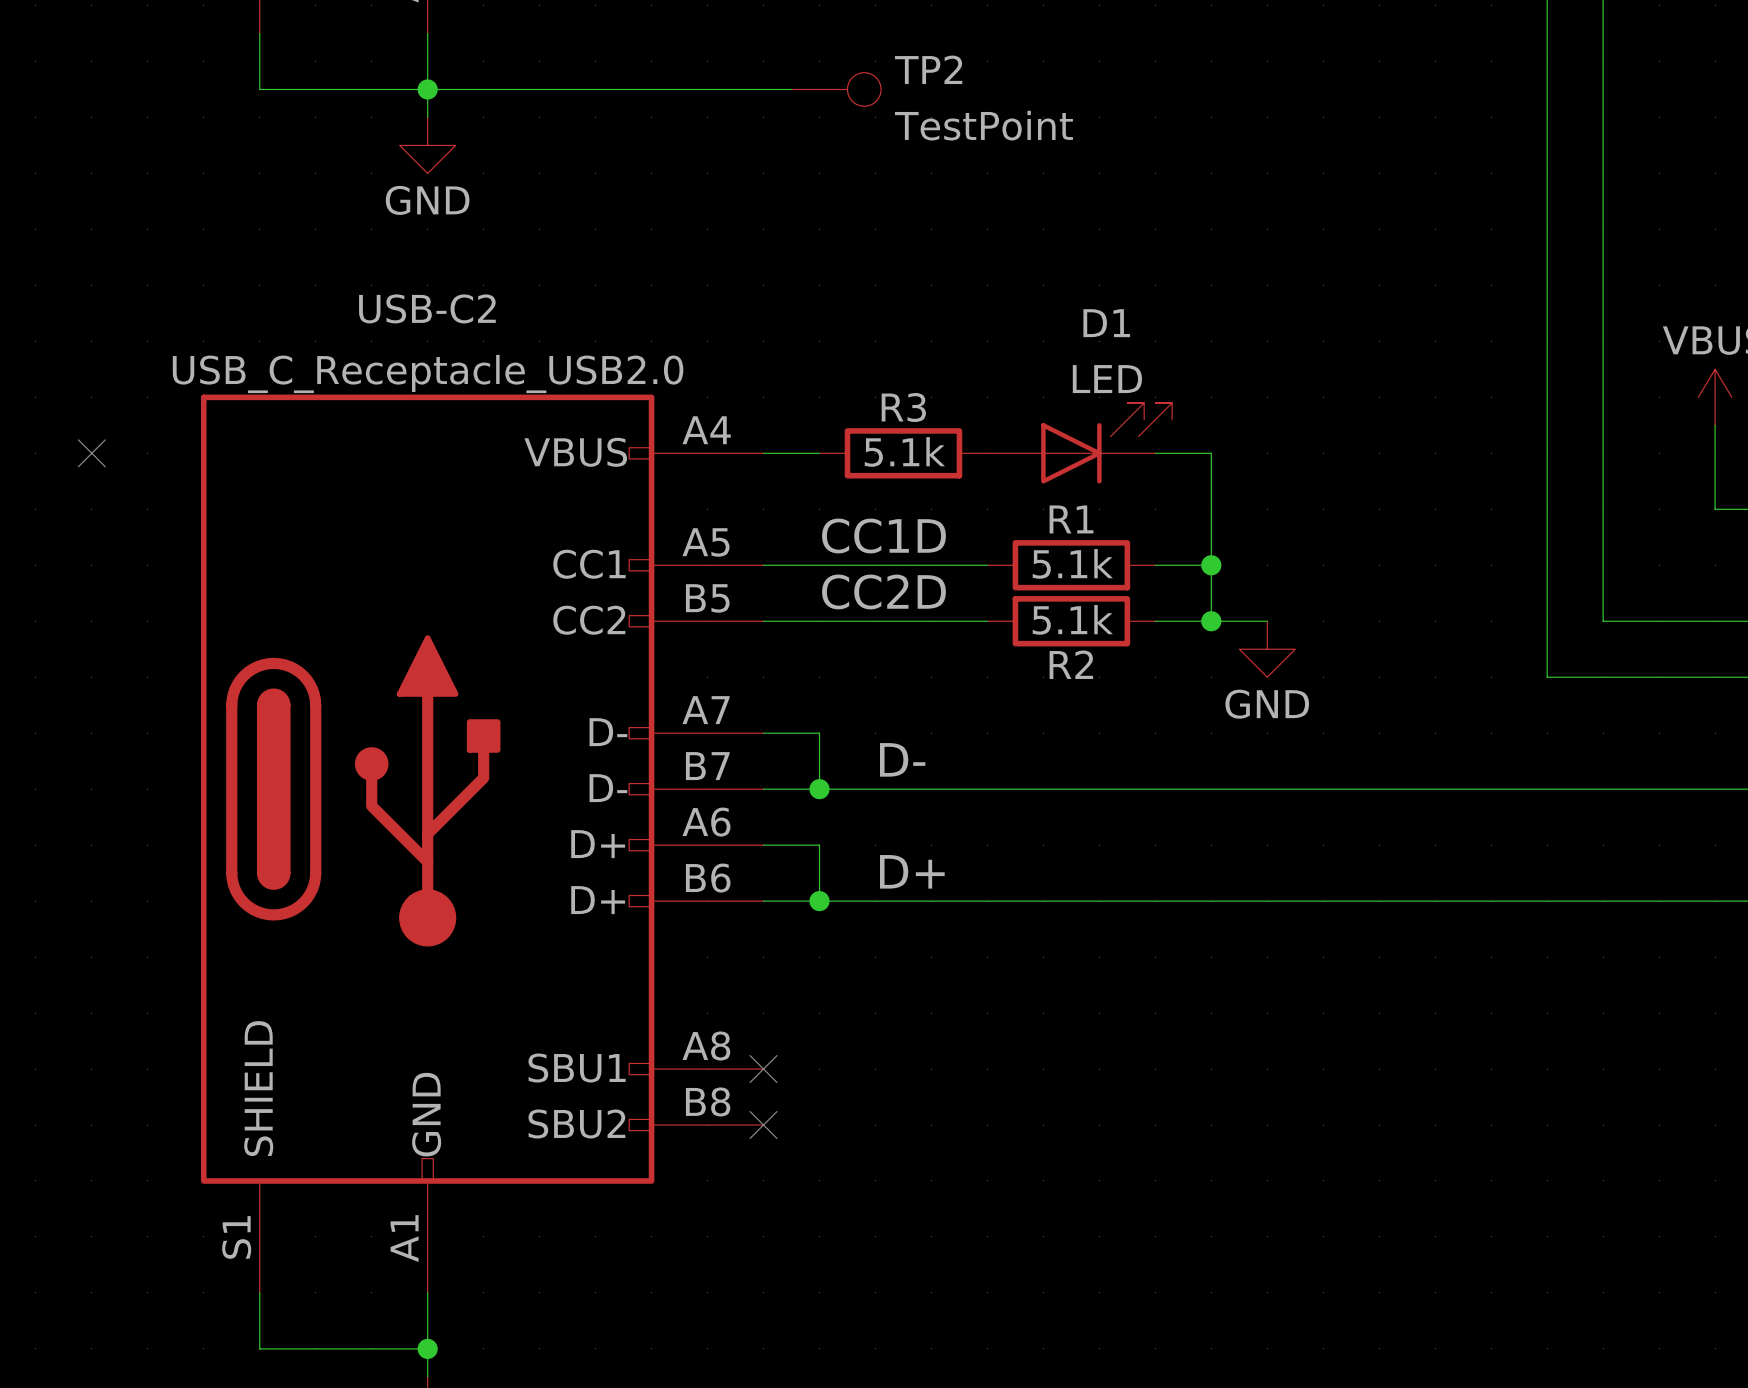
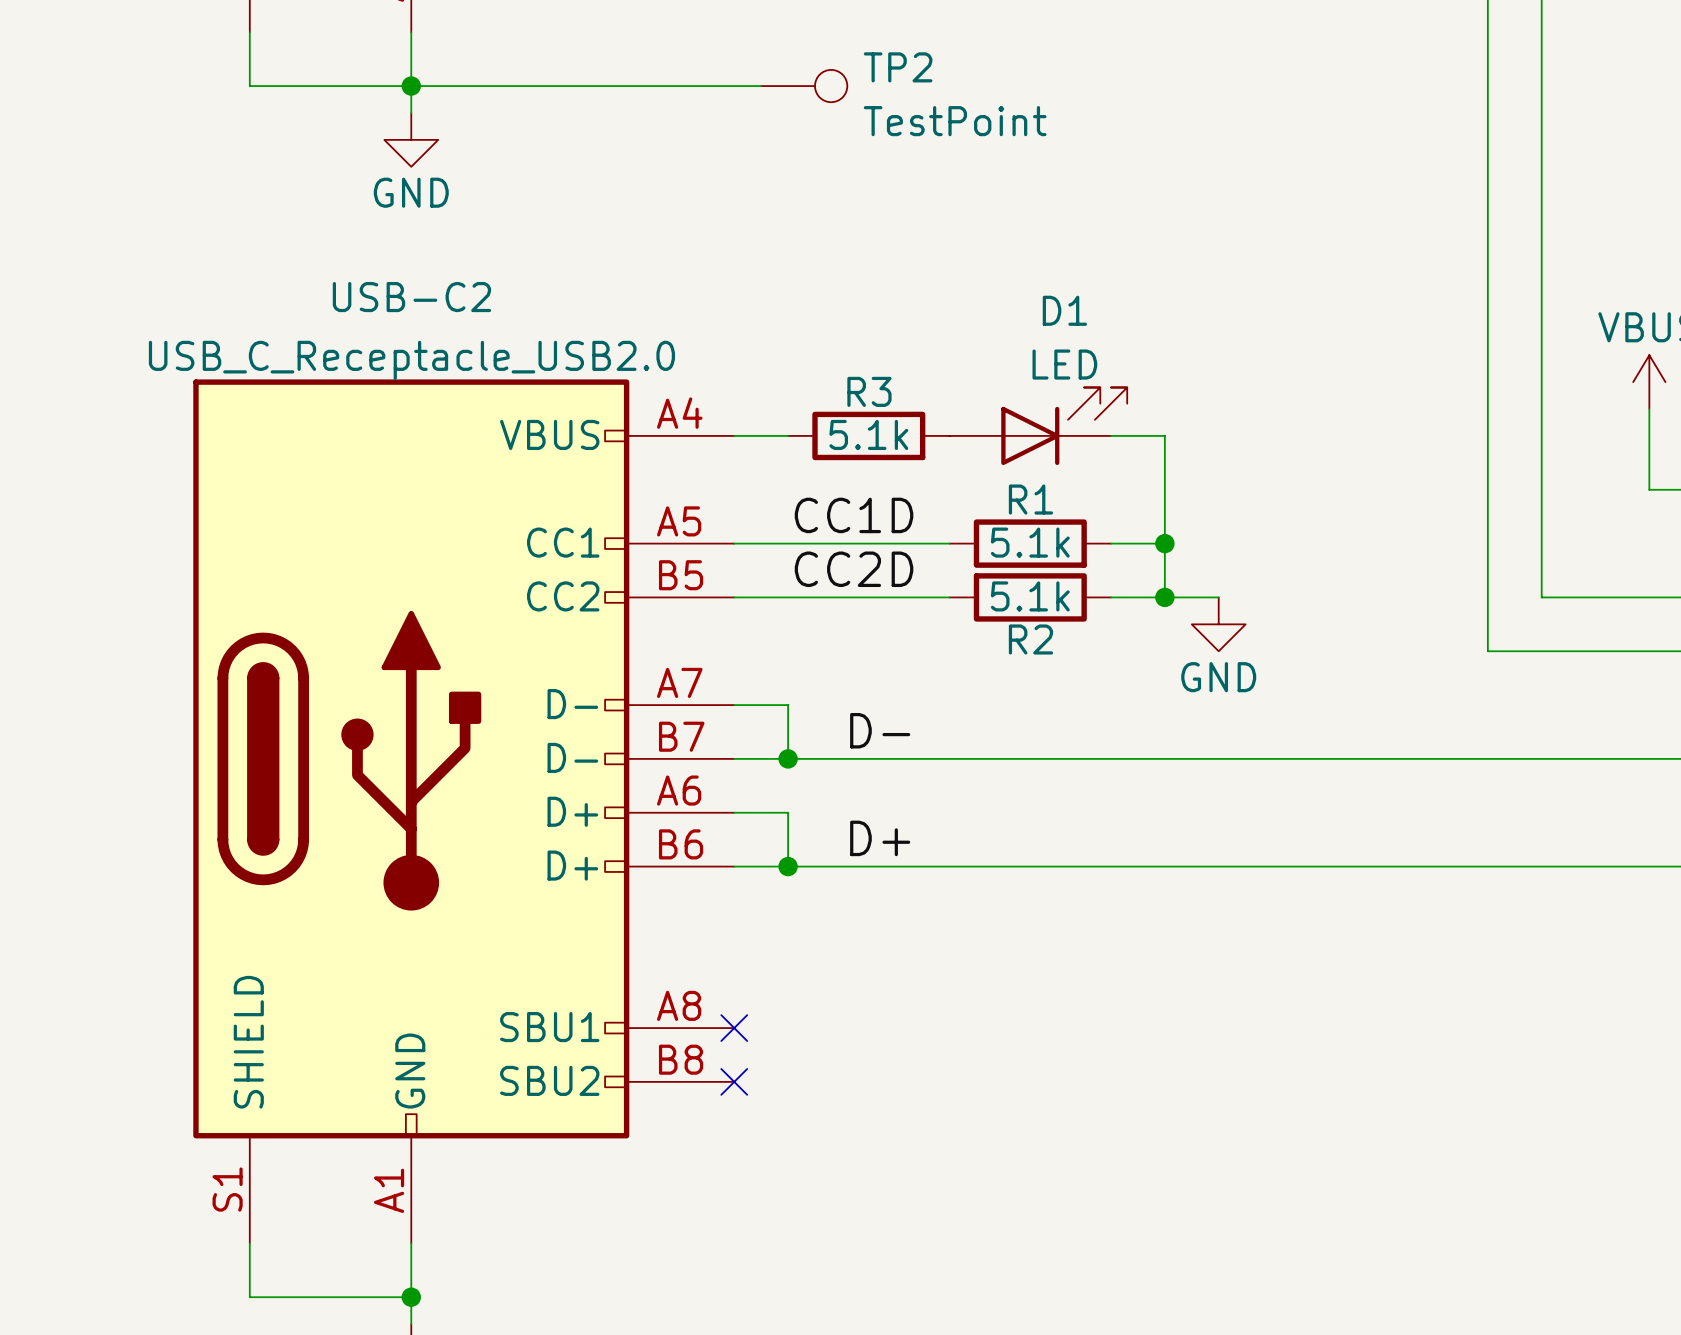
no-connect mark: (91, 453) -> none

